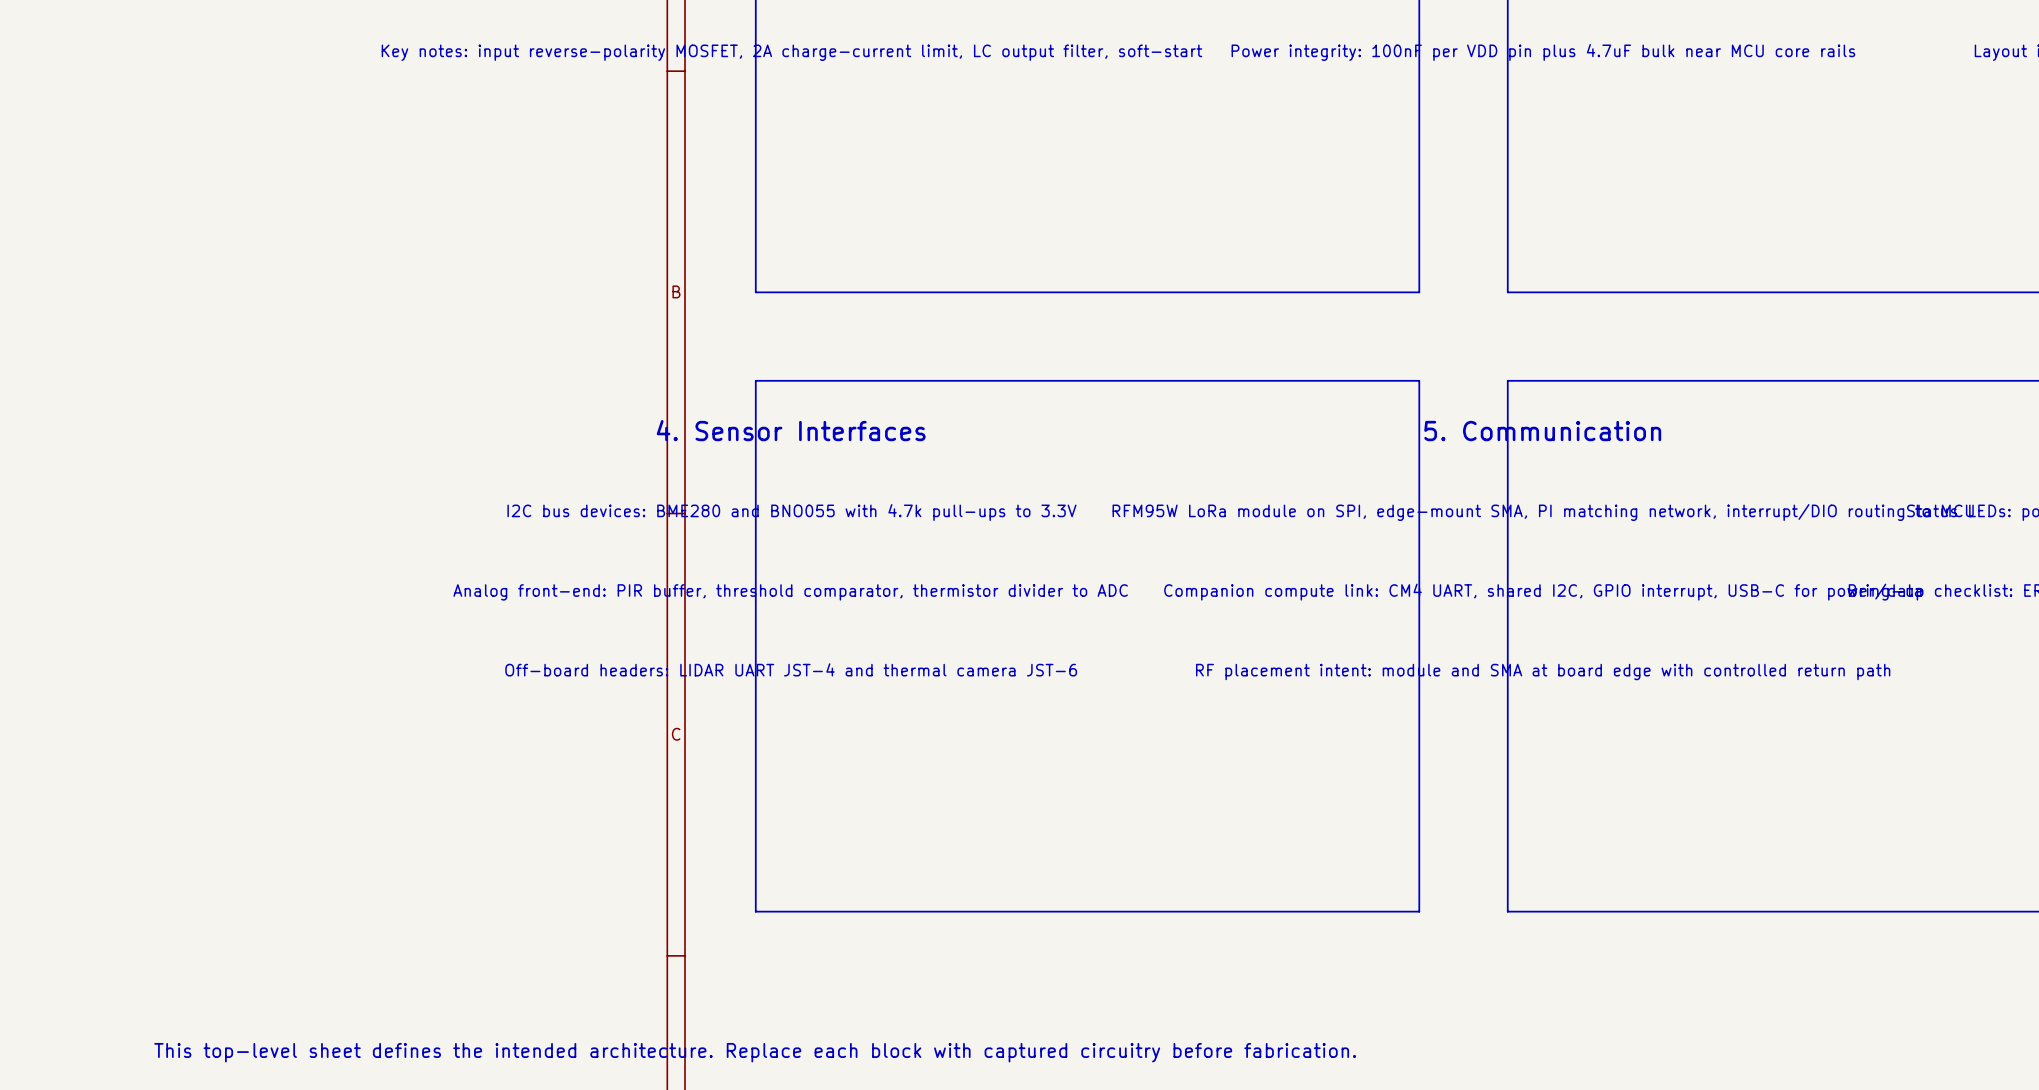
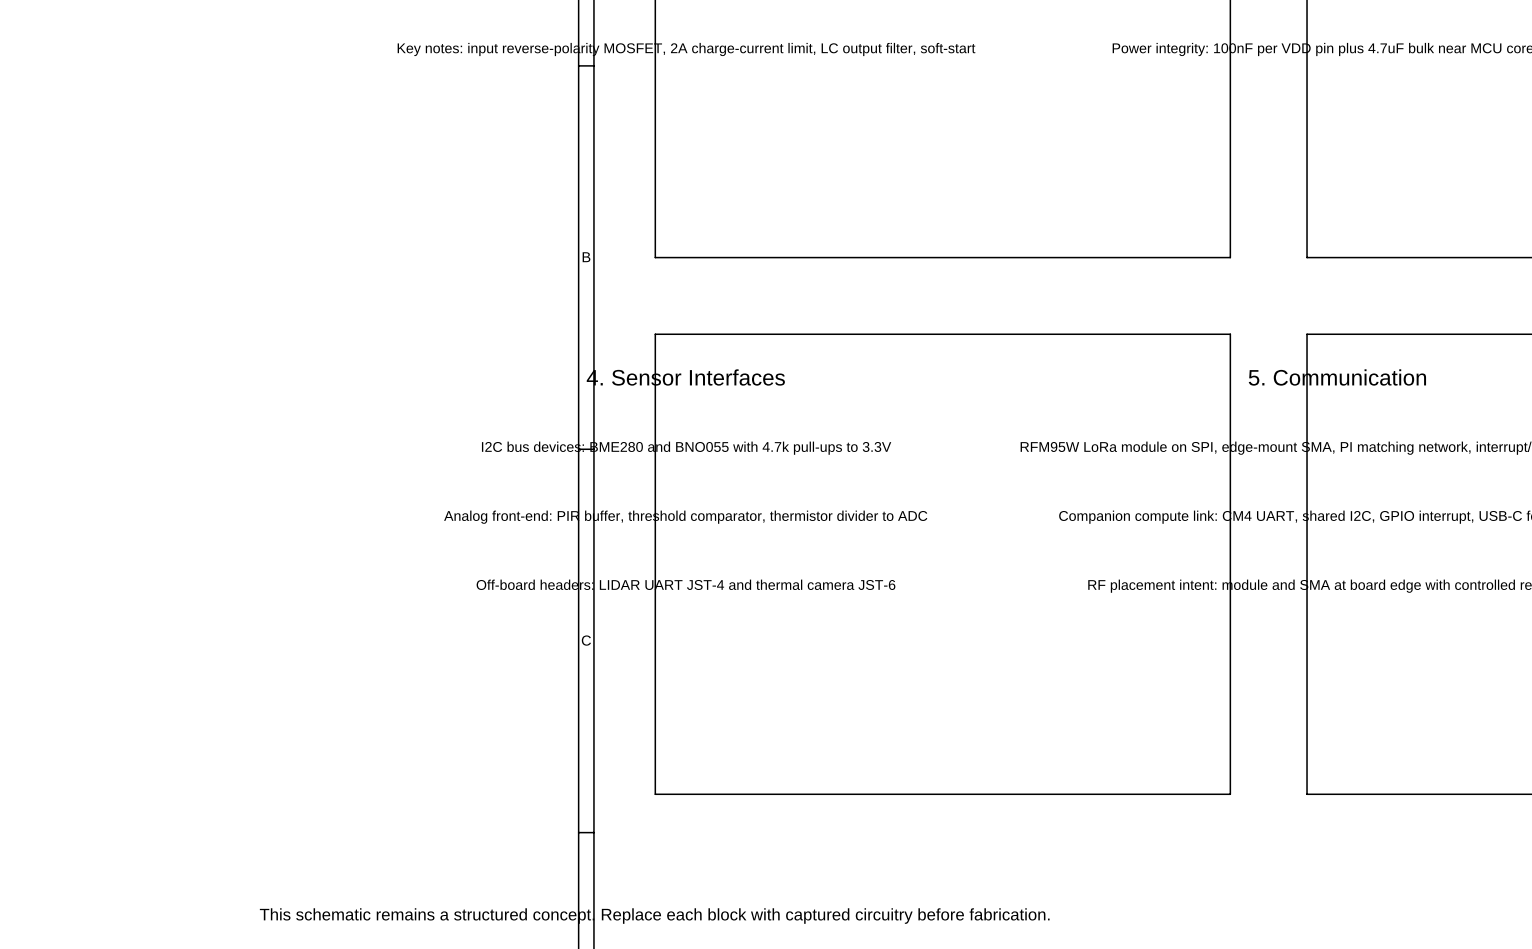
text: This top-level sheet defines the intended architecture. Replace each block with captured circuitry before fabrication. (755, 1052) -> This schematic remains a structured concept. Replace each block with captured circuitry before fabrication. (654, 916)

